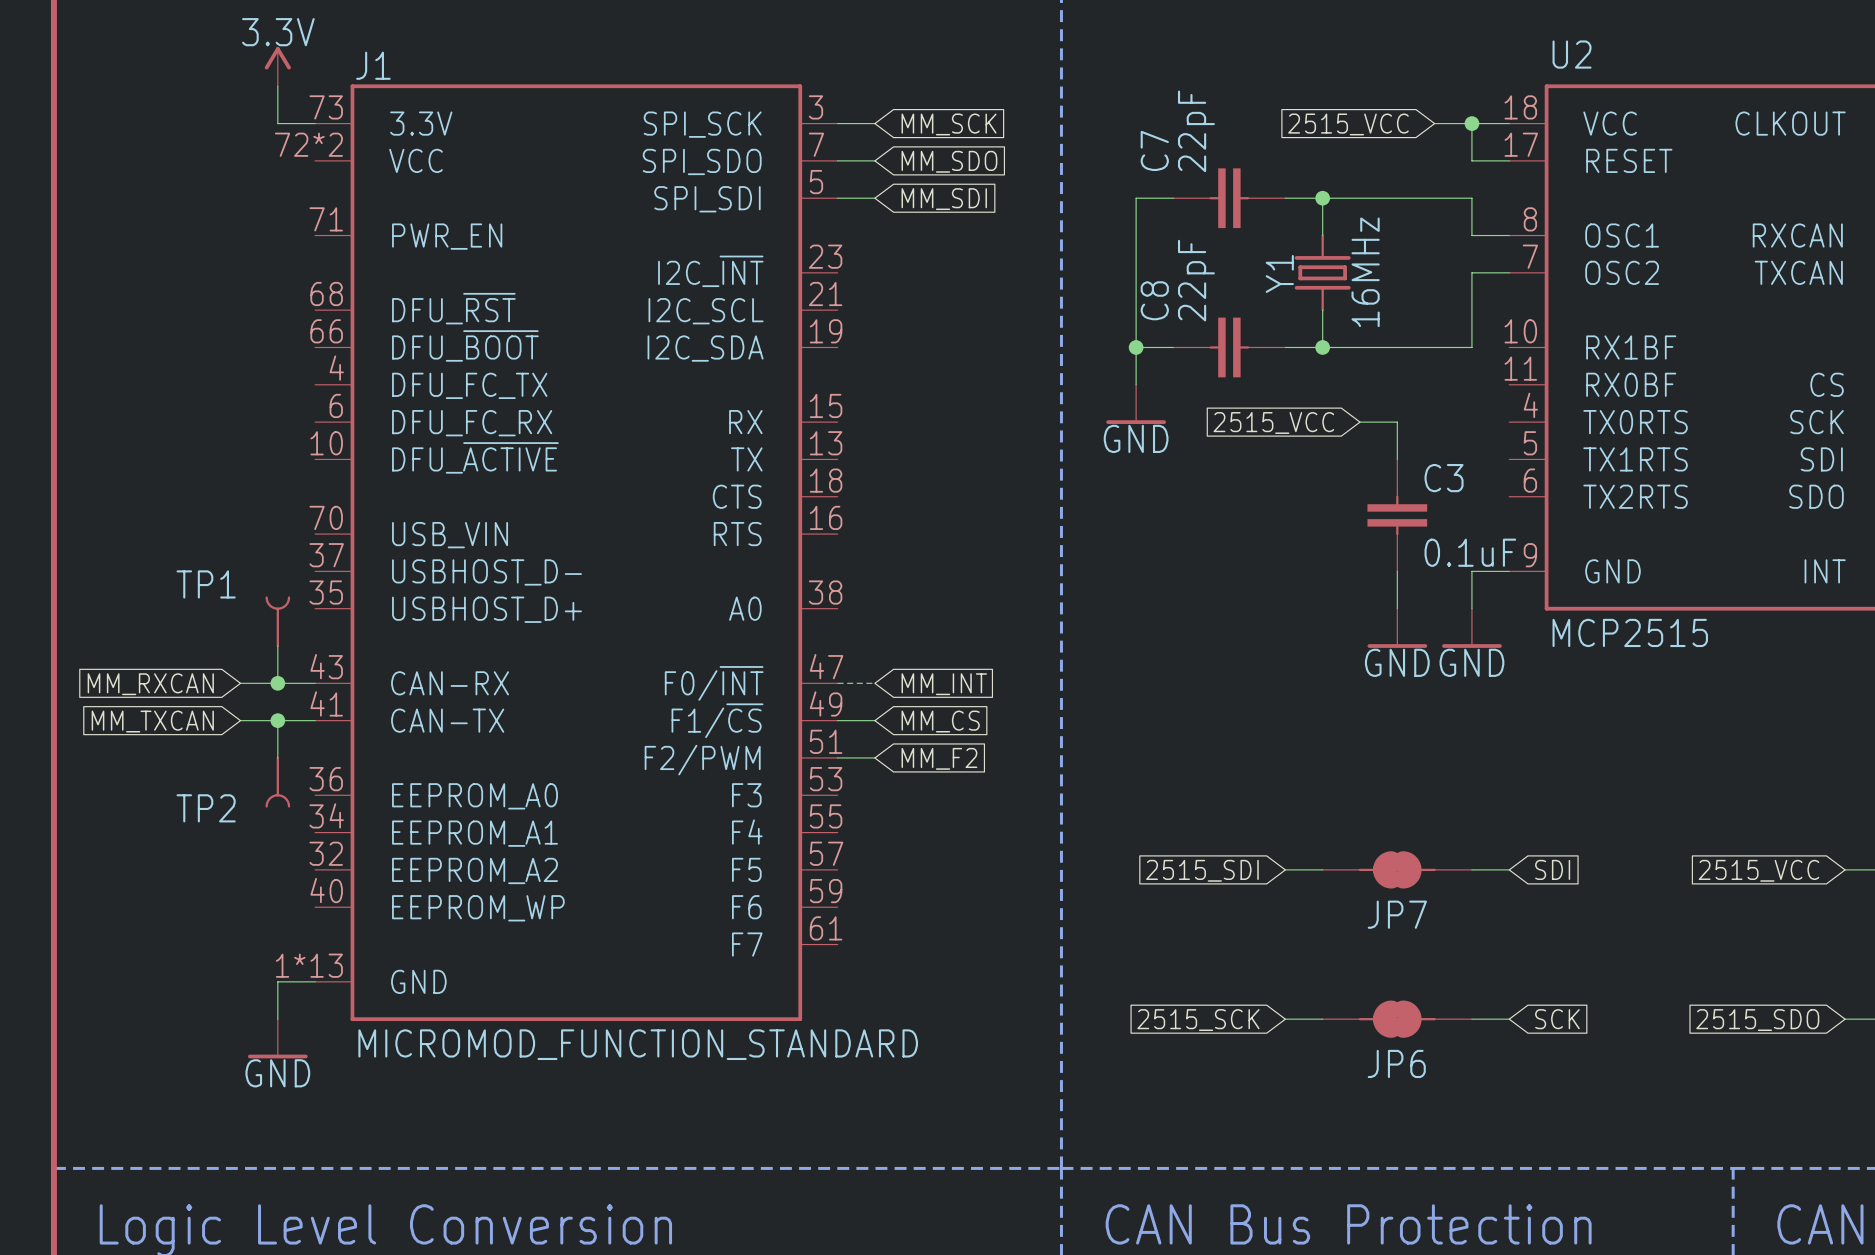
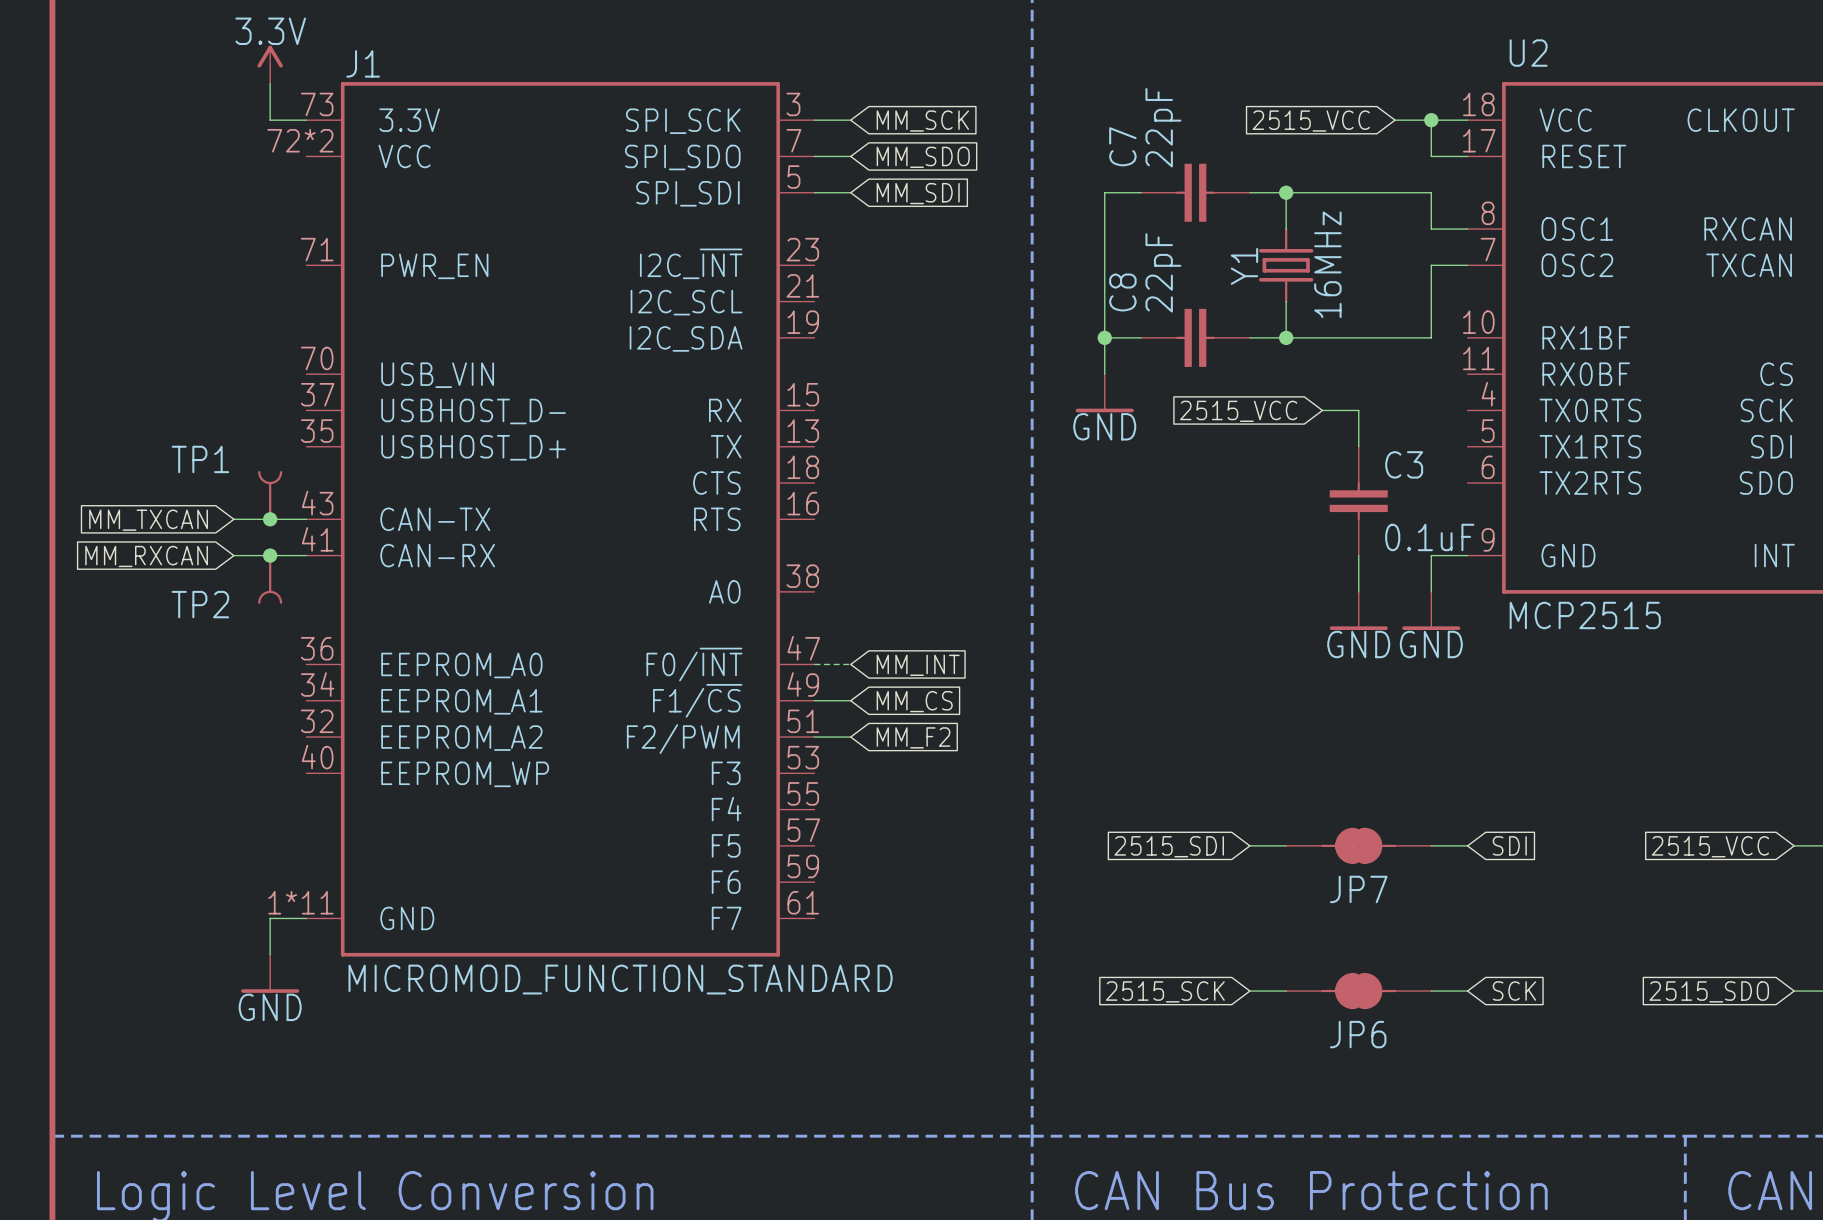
J1 symbol: [315, 84, 838, 1022] -> [306, 82, 815, 957]
junction: none -> (270, 519)
junction: none -> (270, 555)
TP1 position: (277, 621) -> (270, 495)
wire: (277, 646) (277, 683) -> none
wire: (240, 683) (315, 683) -> (233, 519) (306, 519)
junction: (277, 683) -> none
global label position: MM_RXCAN (150, 684) -> MM_RXCAN (146, 556)
wire: (240, 720) (315, 720) -> (233, 555) (306, 555)
wire: (277, 720) (277, 757) -> none
junction: (277, 720) -> none
global label position: MM_TXCAN (152, 721) -> MM_TXCAN (148, 520)
TP2 position: (277, 782) -> (270, 579)
wire: (315, 981) (277, 981) (277, 1019) -> (306, 918) (270, 918) (270, 954)
power symbol position: GND (277, 1038) -> GND (270, 973)

